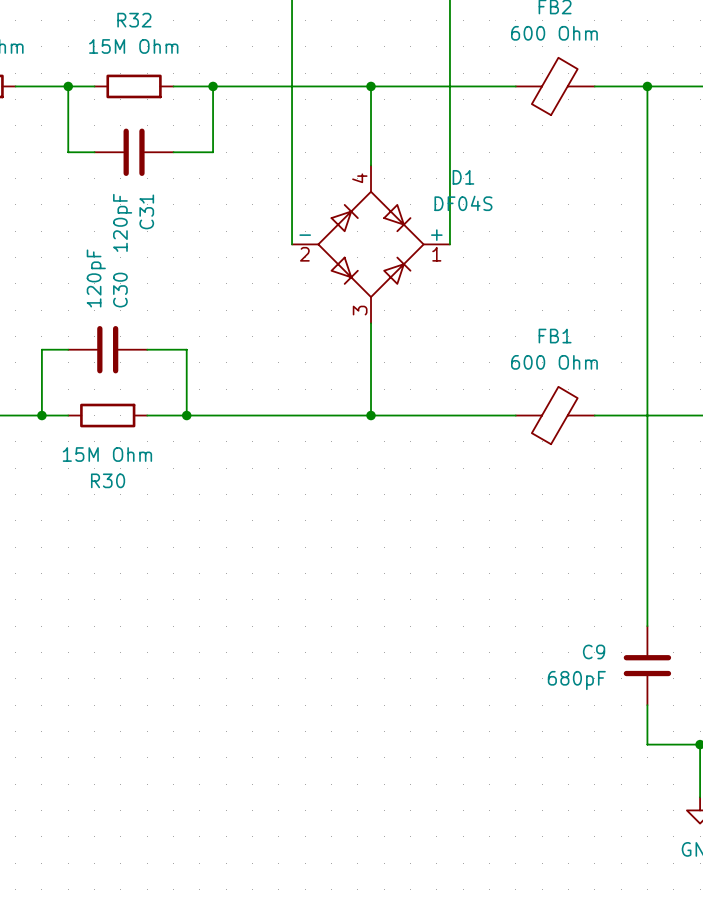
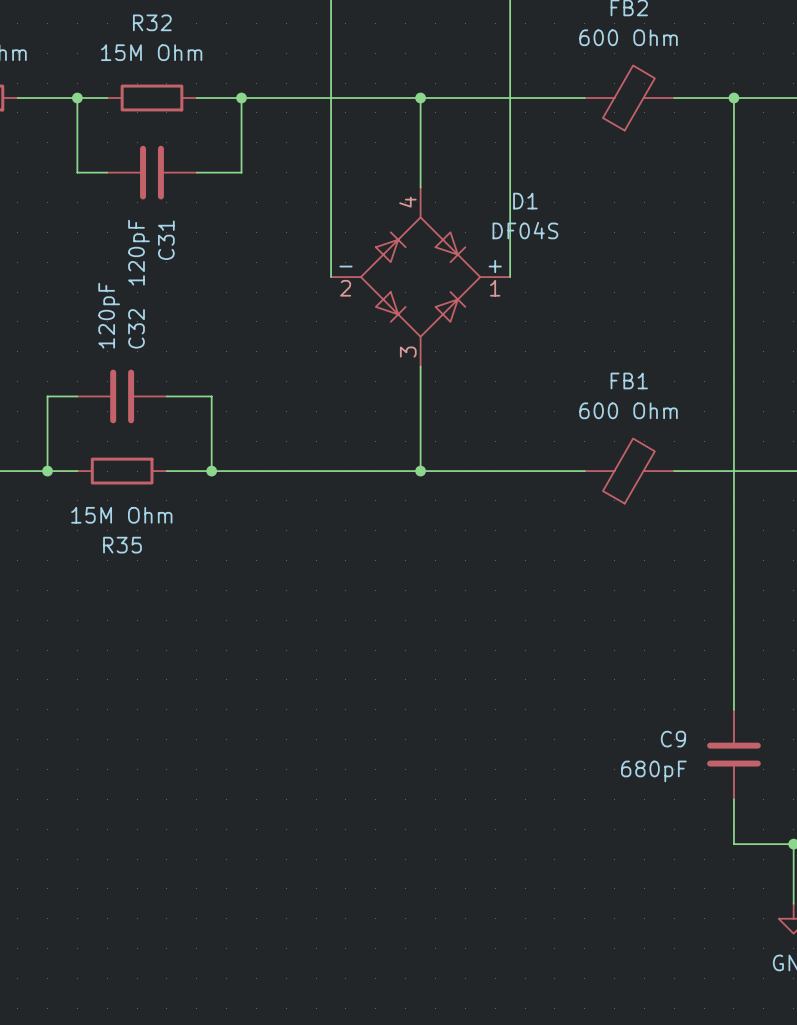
C30 name: C30 (120, 290) -> C32 (136, 328)
R30 name: R30 (108, 480) -> R35 (122, 545)

